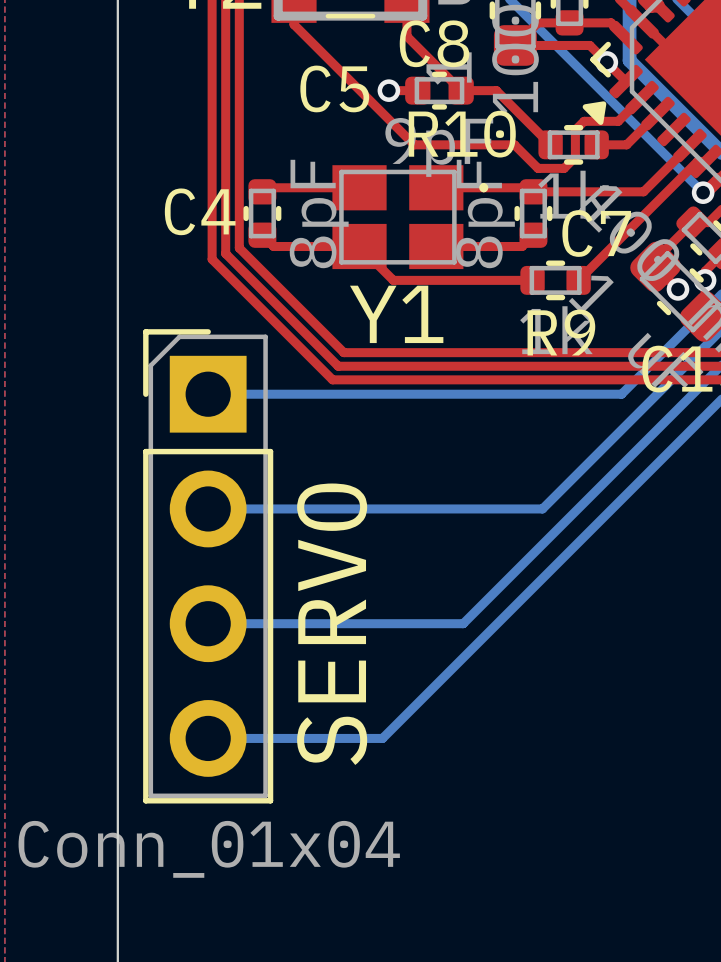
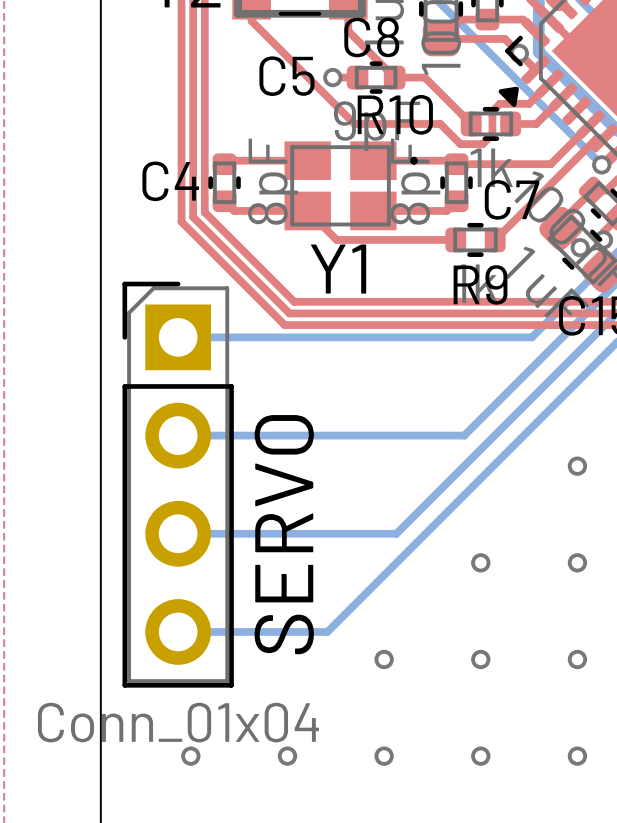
via: none -> (577, 466)
via: none -> (480, 562)
via: none -> (577, 562)
via: none -> (384, 659)
via: none -> (480, 659)
via: none -> (577, 659)
via: none -> (190, 756)
via: none -> (287, 756)
via: none -> (384, 756)
via: none -> (480, 756)
via: none -> (577, 756)

